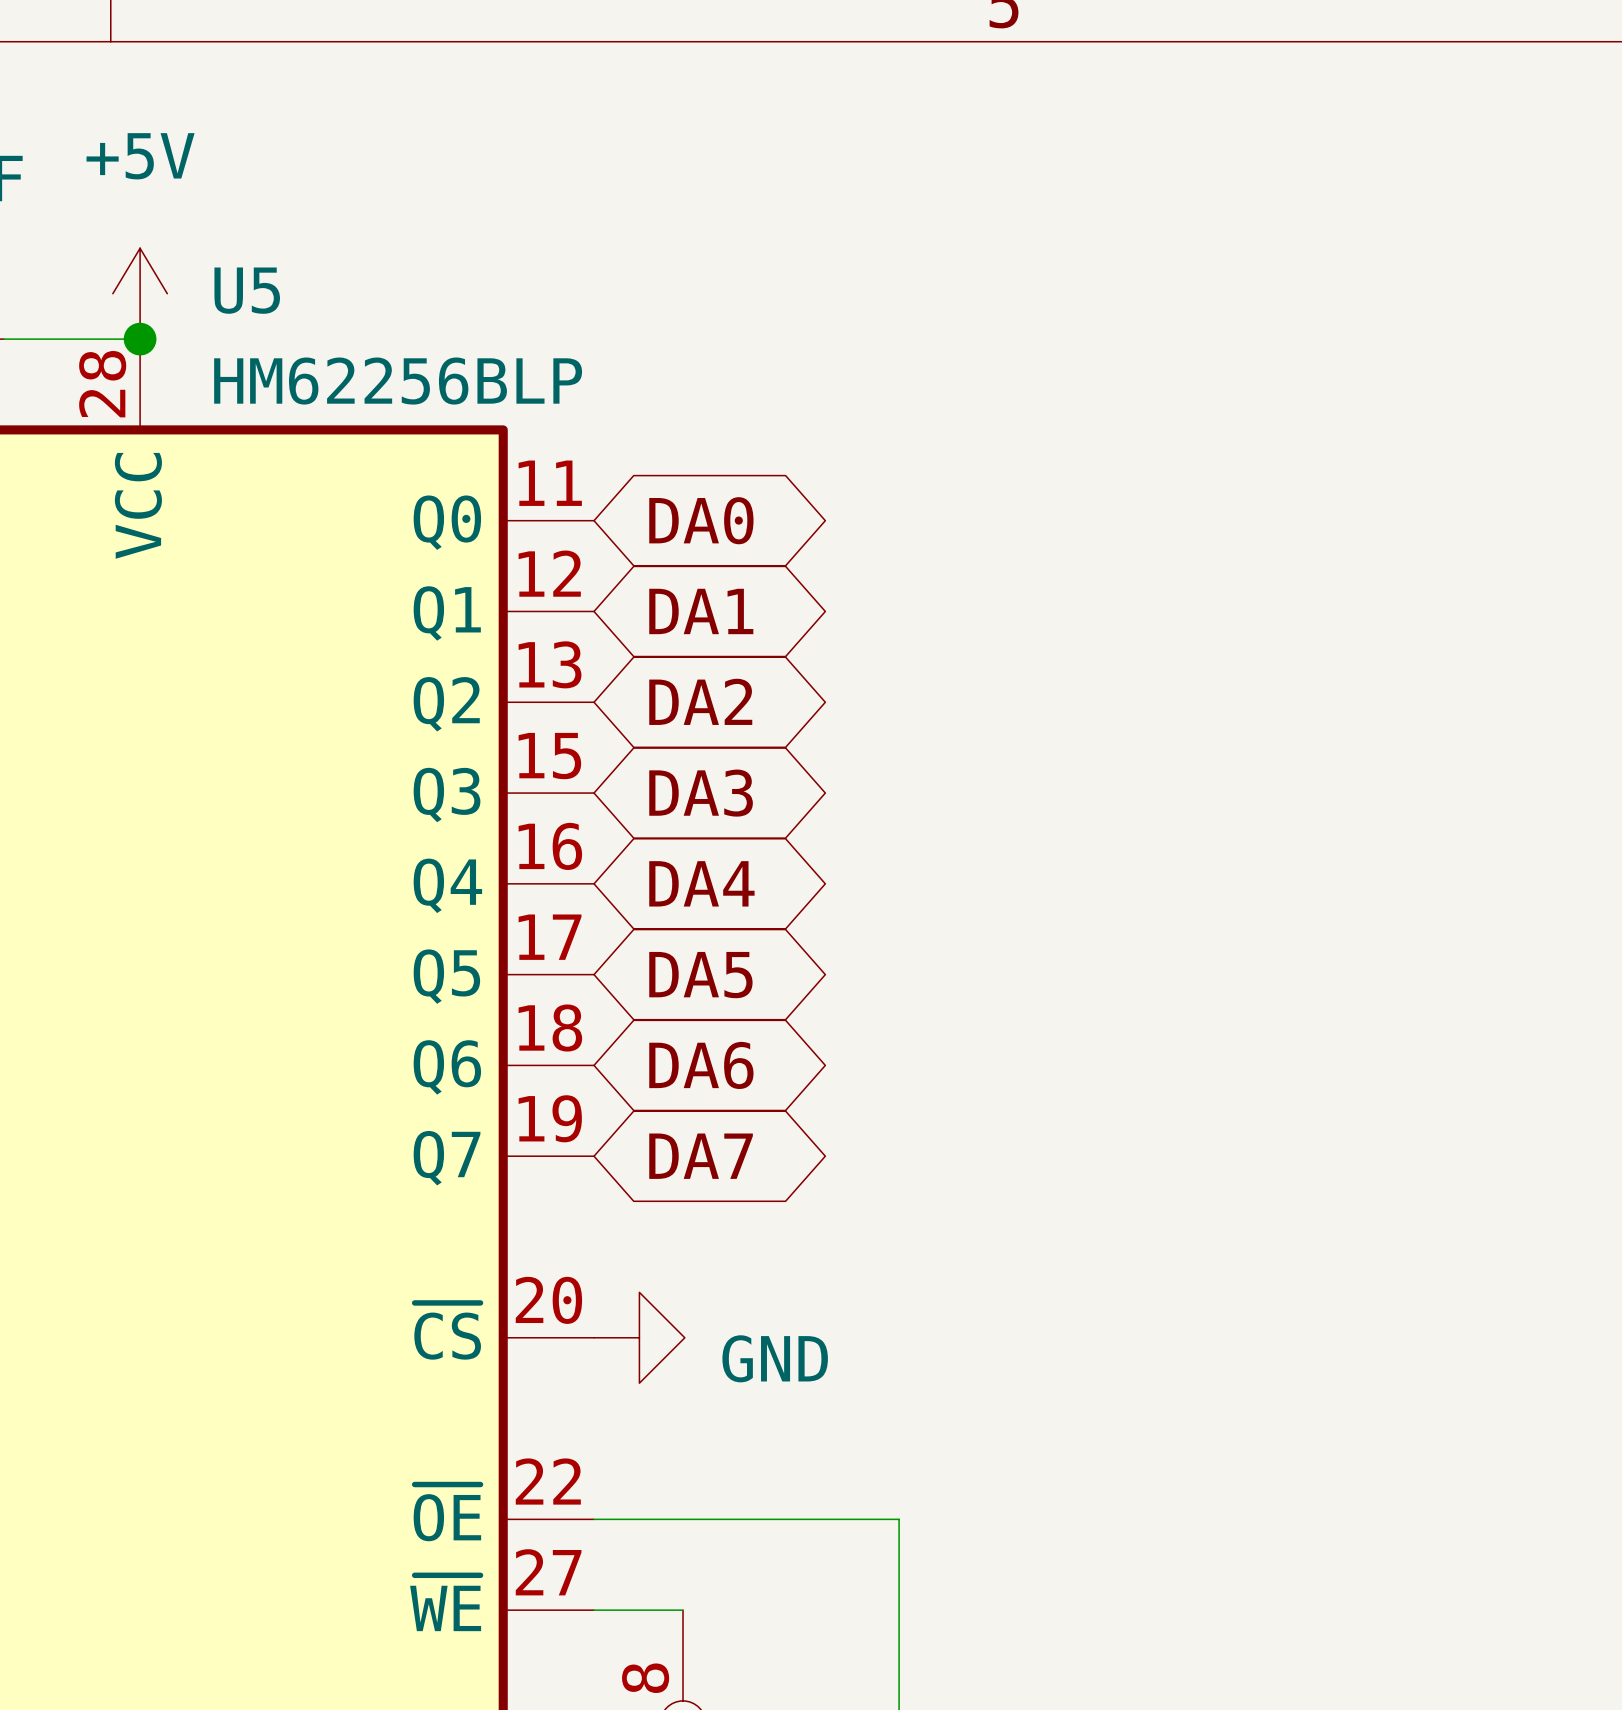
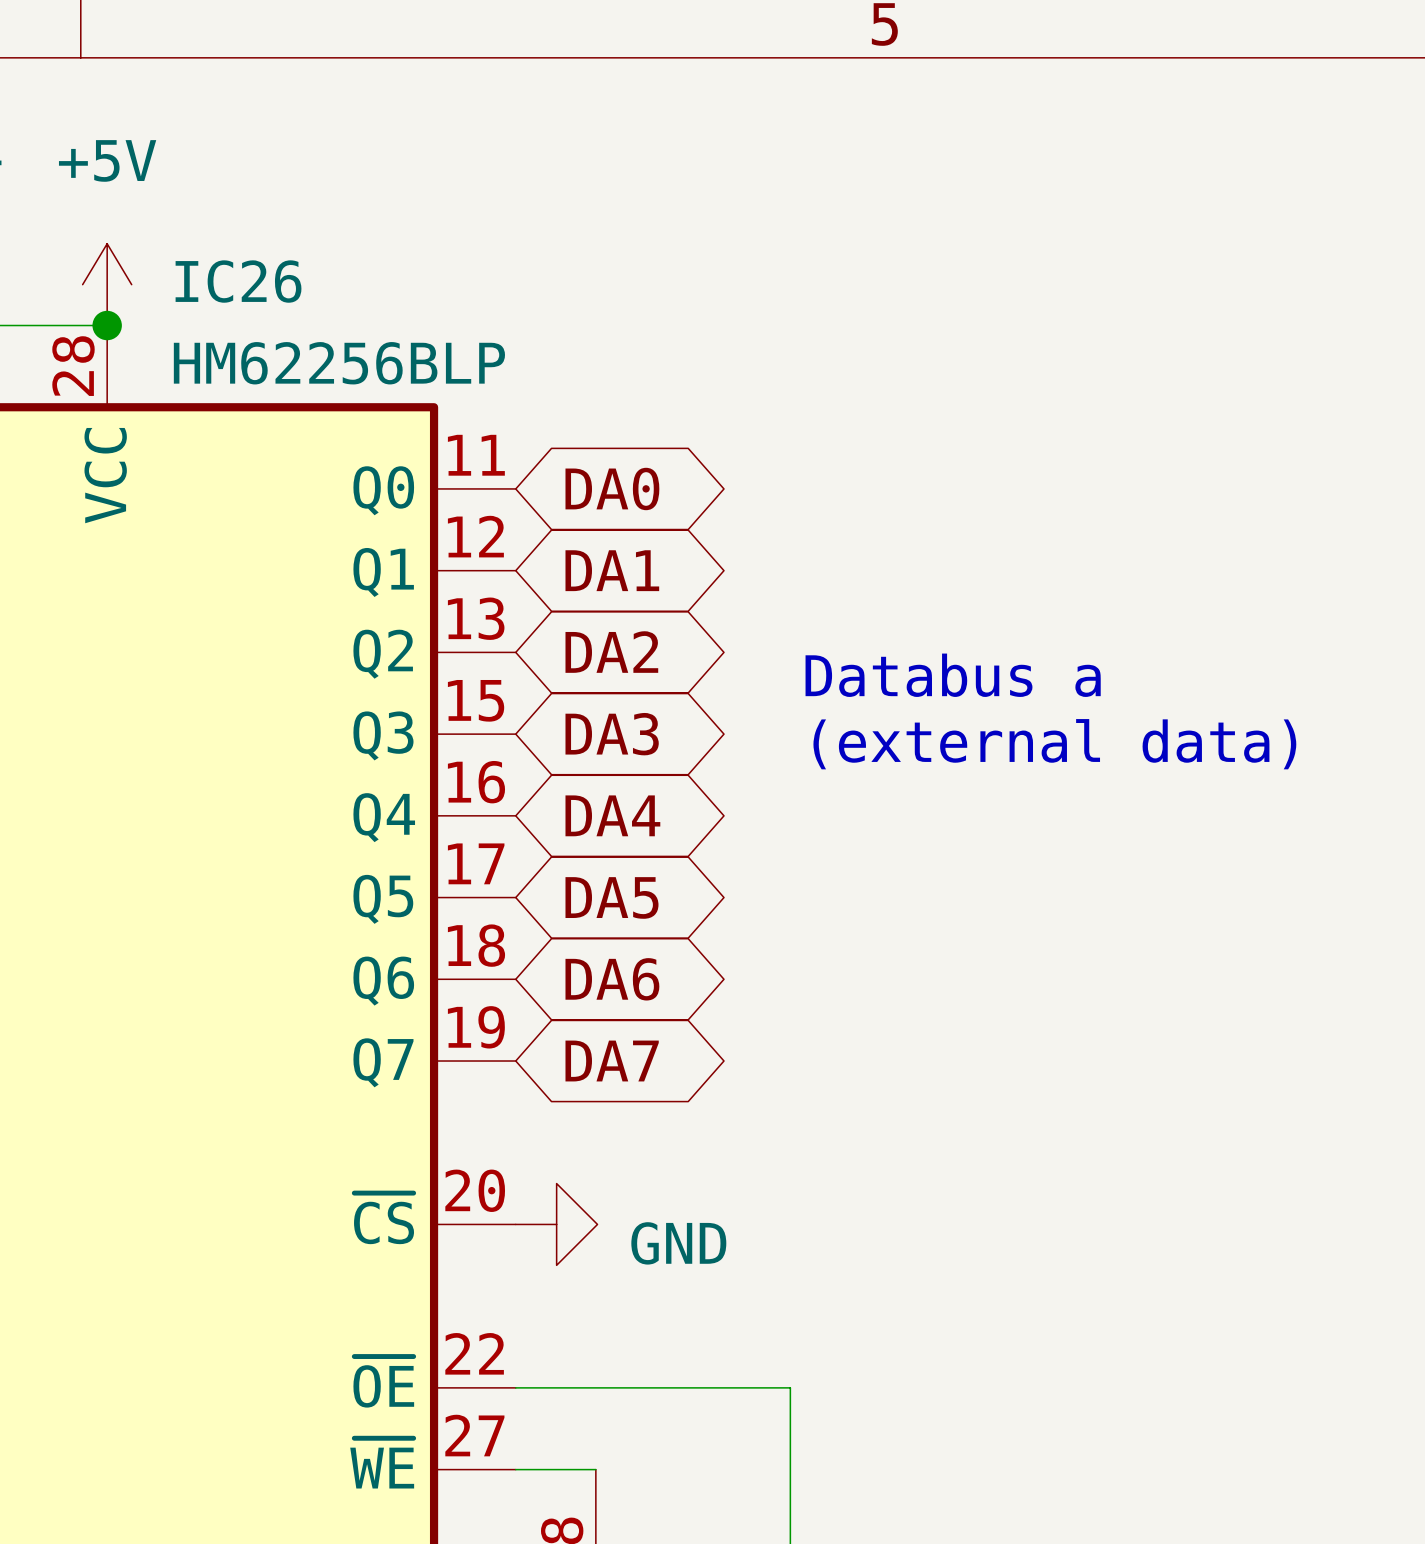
U5 name: U5 (247, 290) -> IC26 (238, 281)
text: none -> Databus a (953, 675)
text: none -> (external data) (1054, 744)

